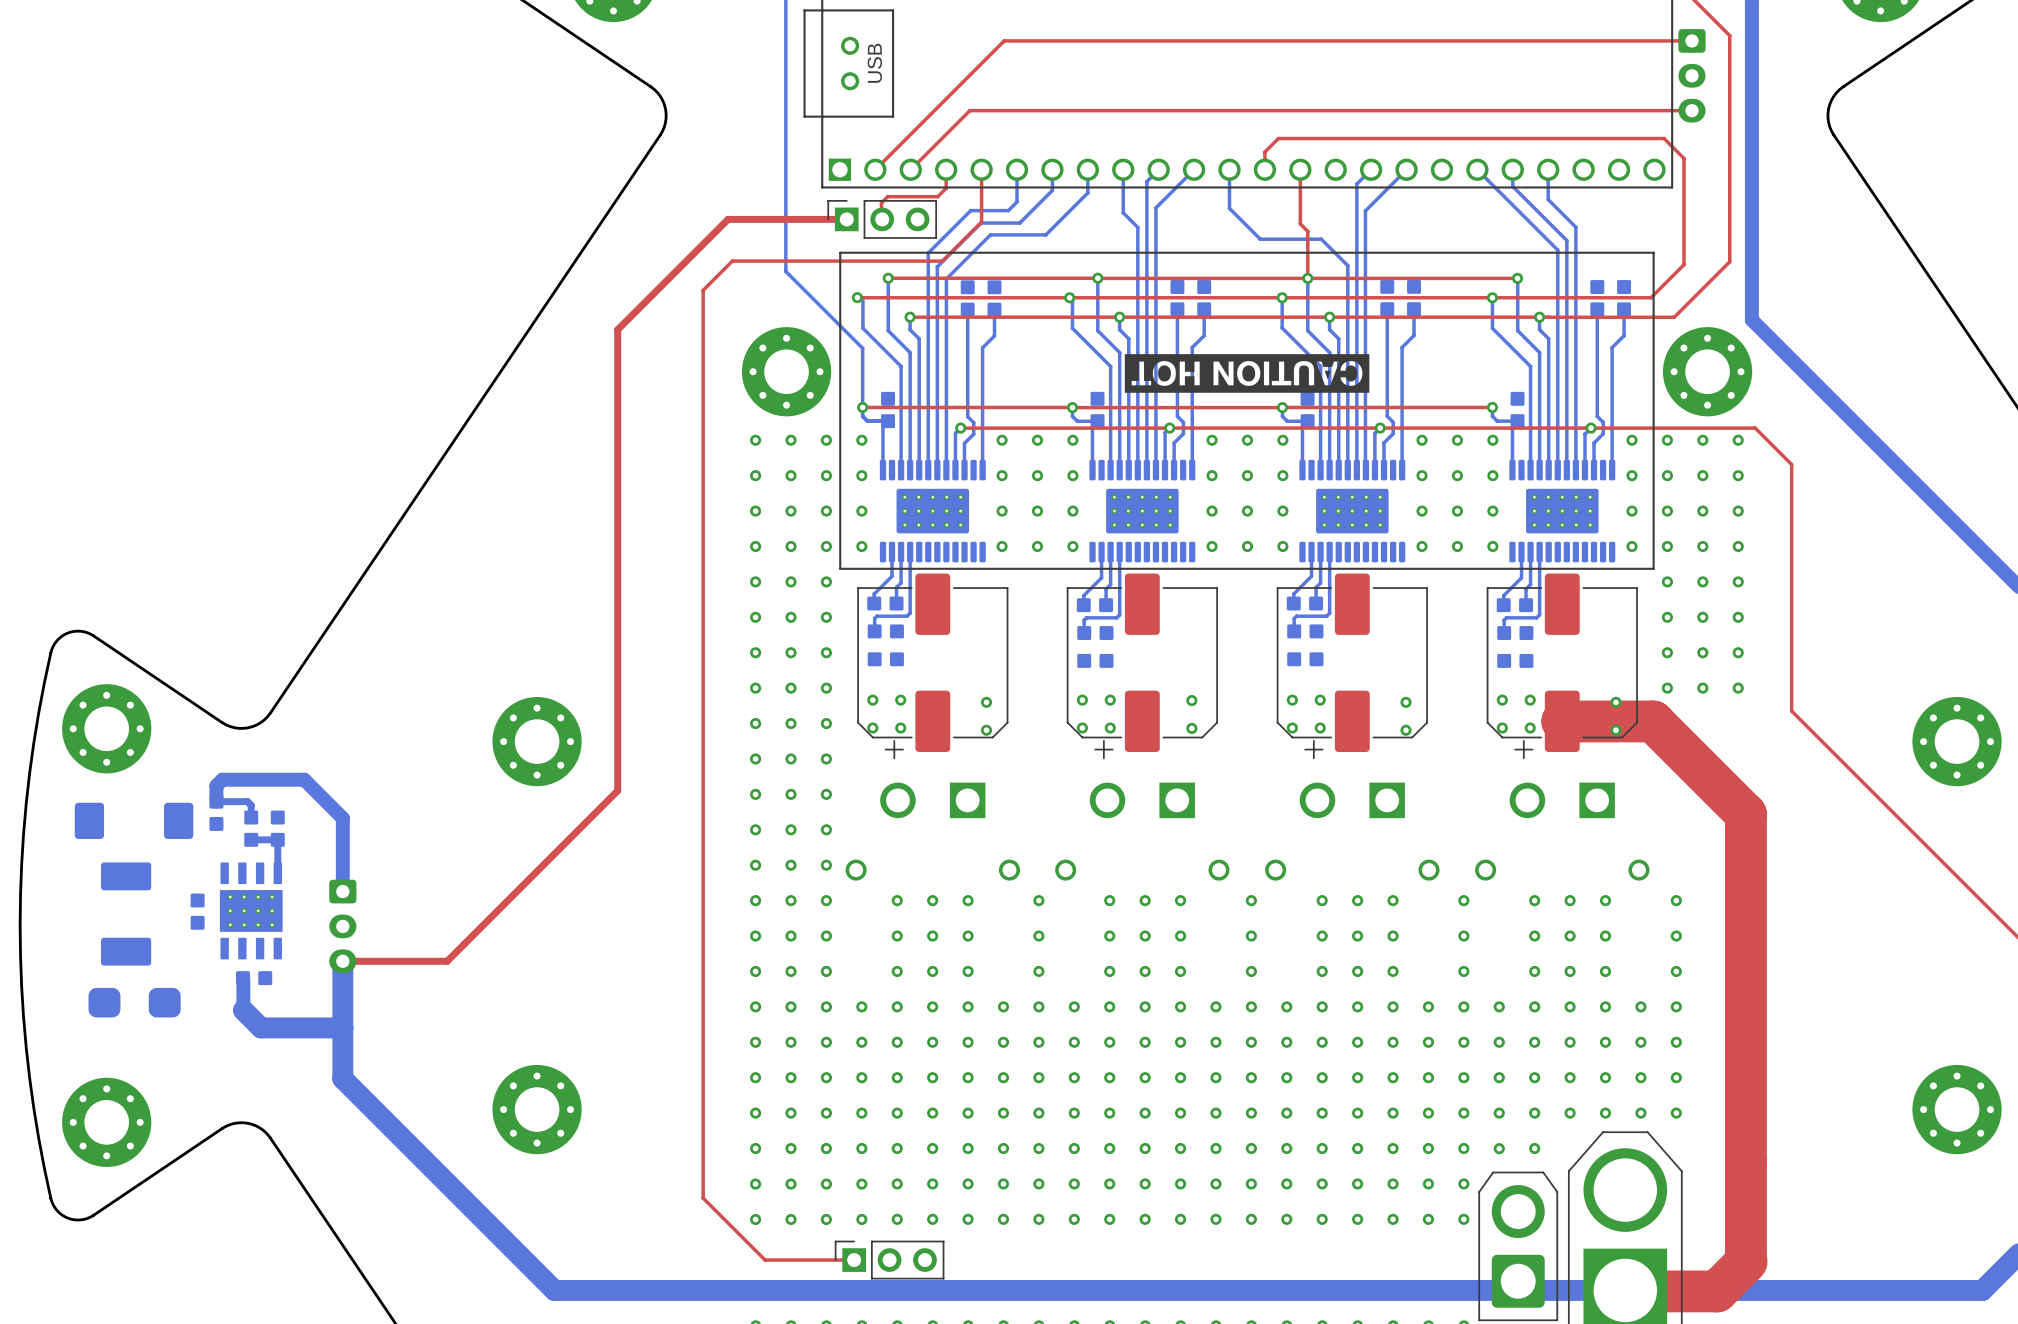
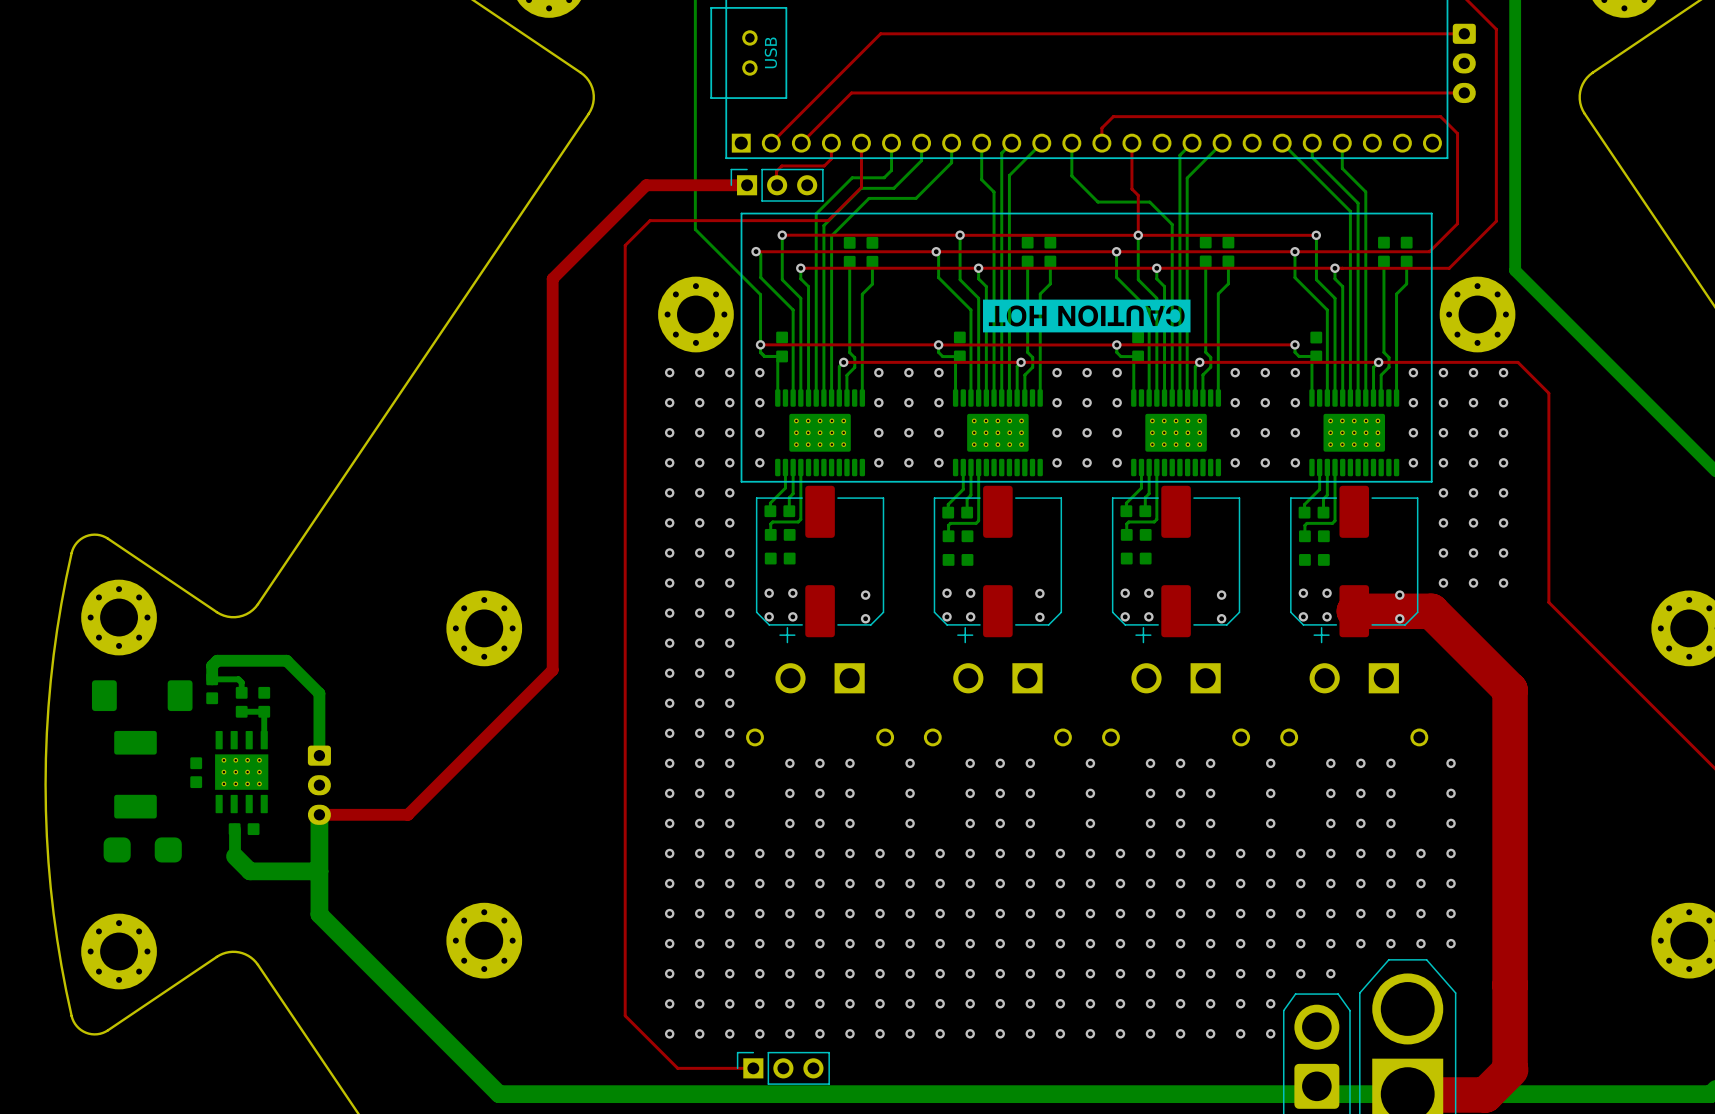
top track width: thin (846, 219) (727, 219) (617, 329) (617, 790) (447, 961) (342, 961) -> thick (747, 185) (646, 185) (552, 278) (552, 670) (407, 814) (319, 814)

